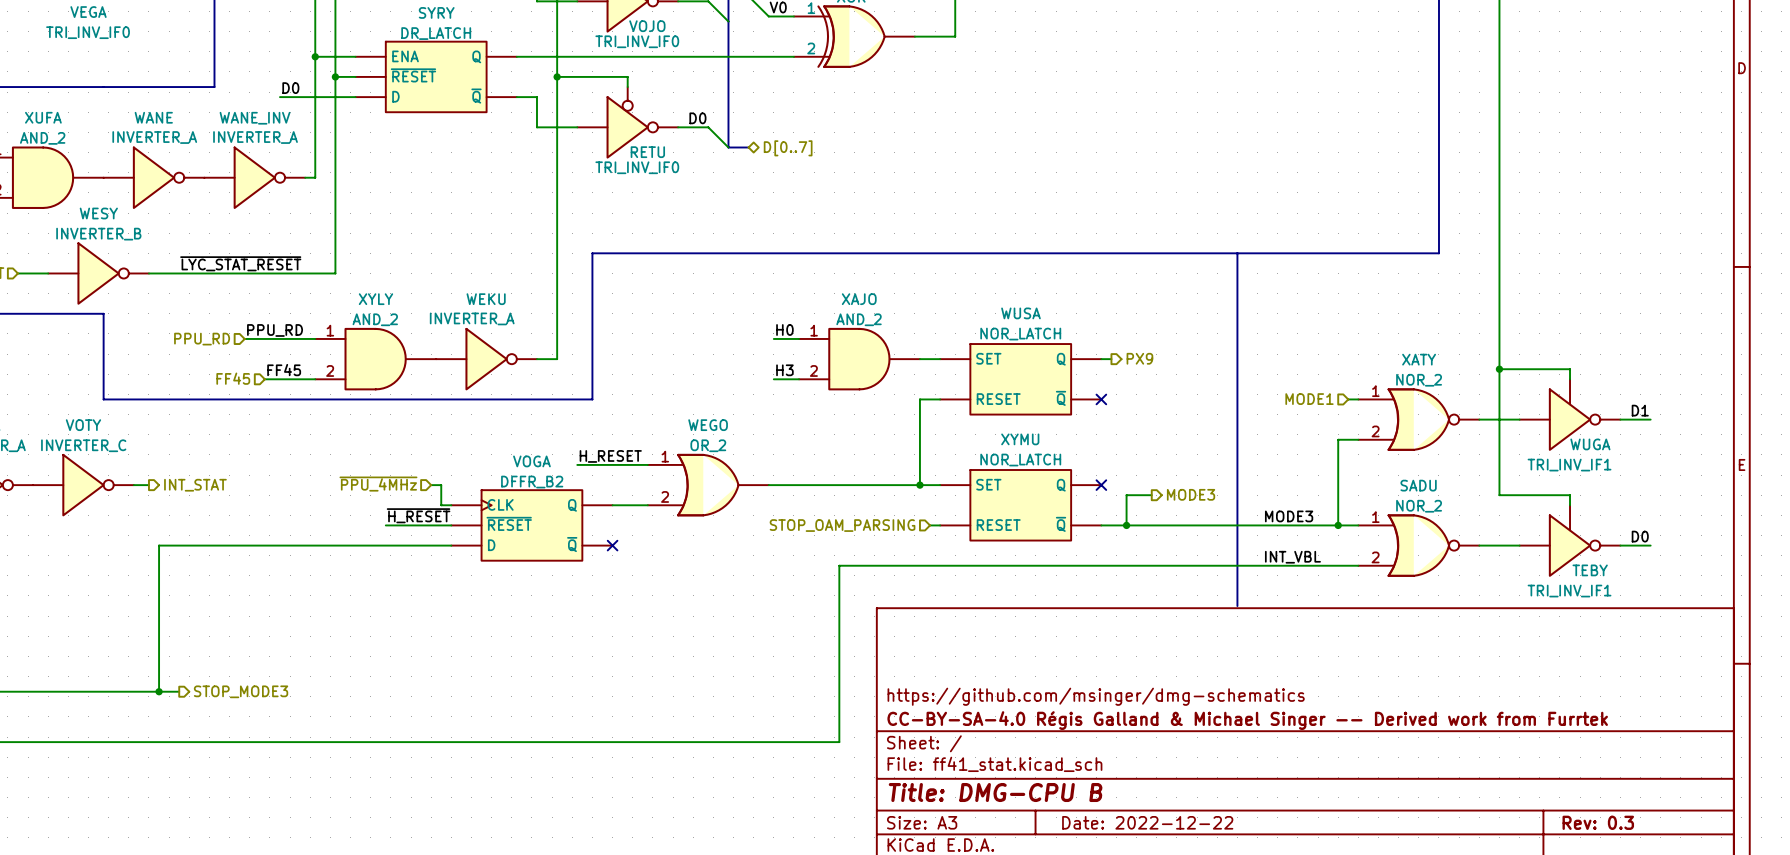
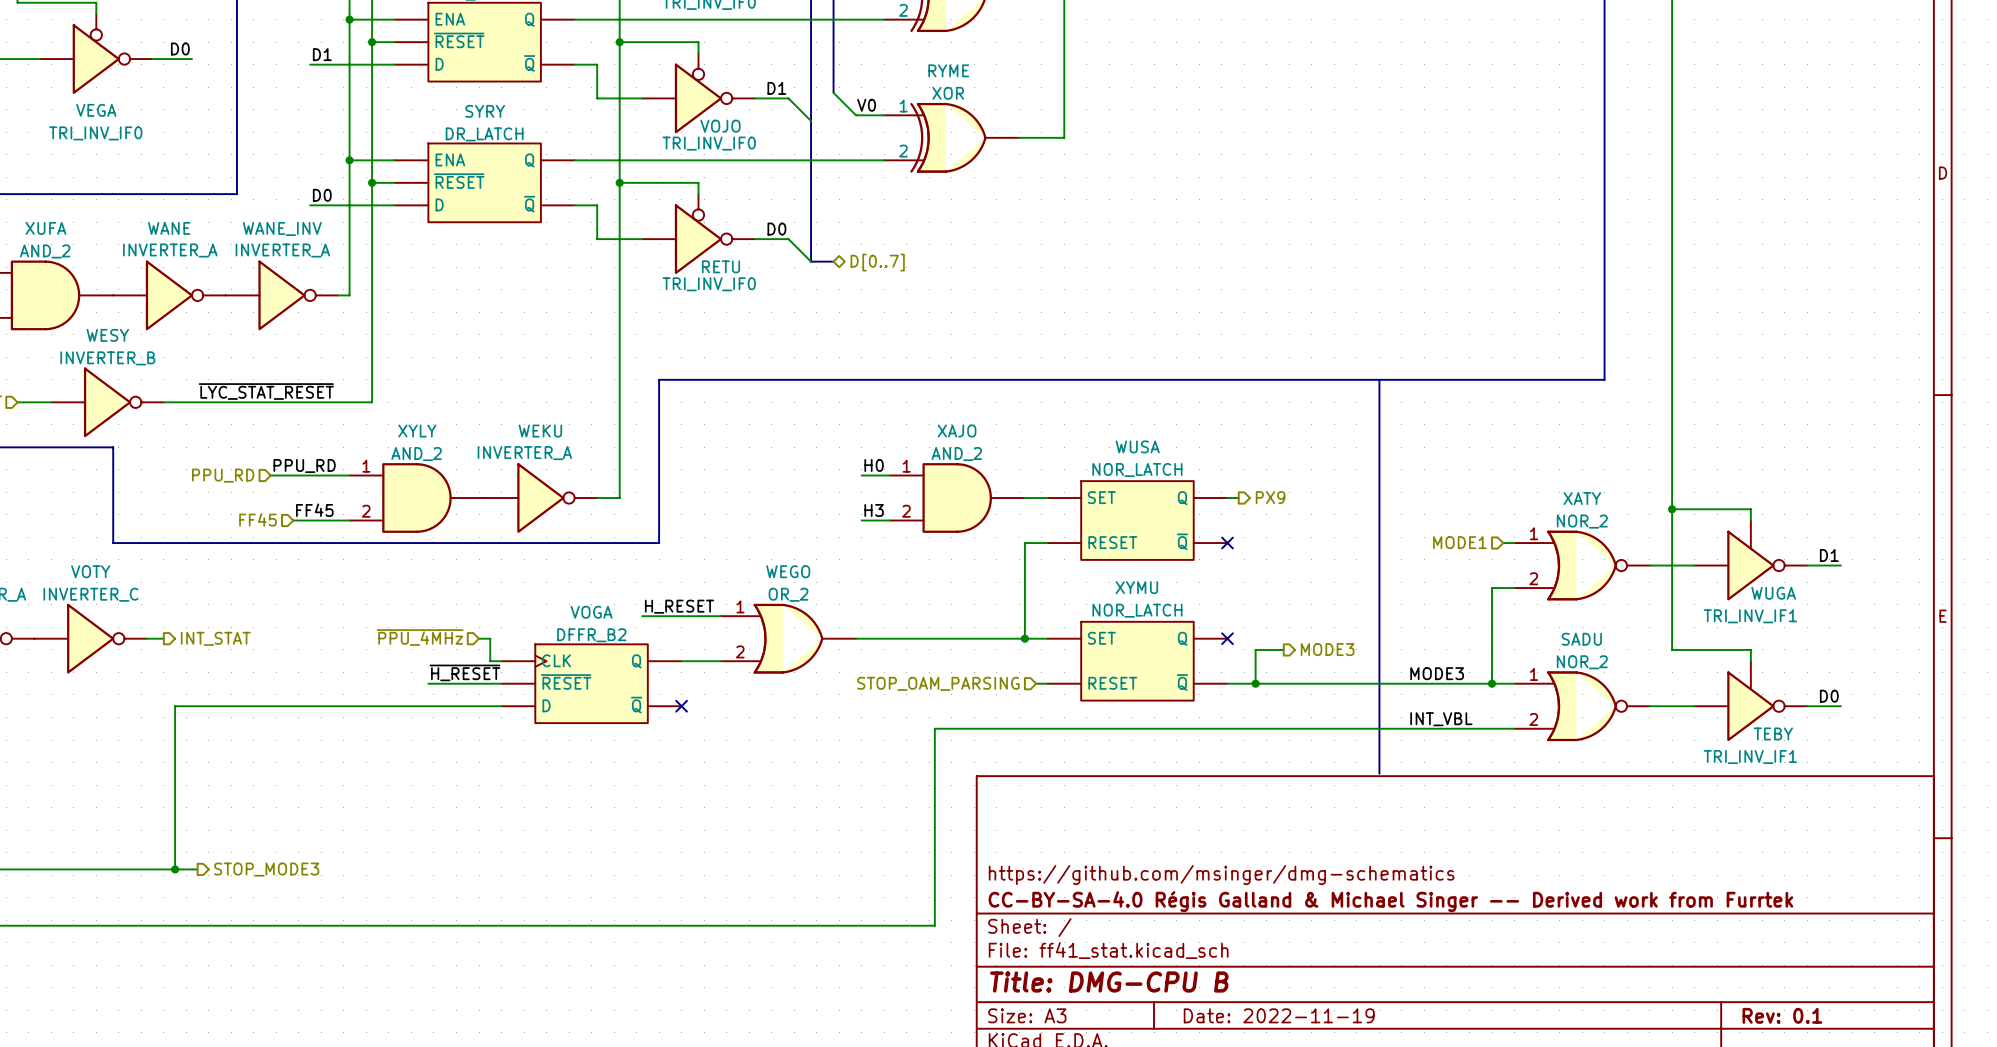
title block: Date: 2022-12-22 (1147, 822) -> Date: 2022-11-19 (1279, 1015)
title block: Rev: 0.3 (1598, 822) -> Rev: 0.1 (1782, 1015)

